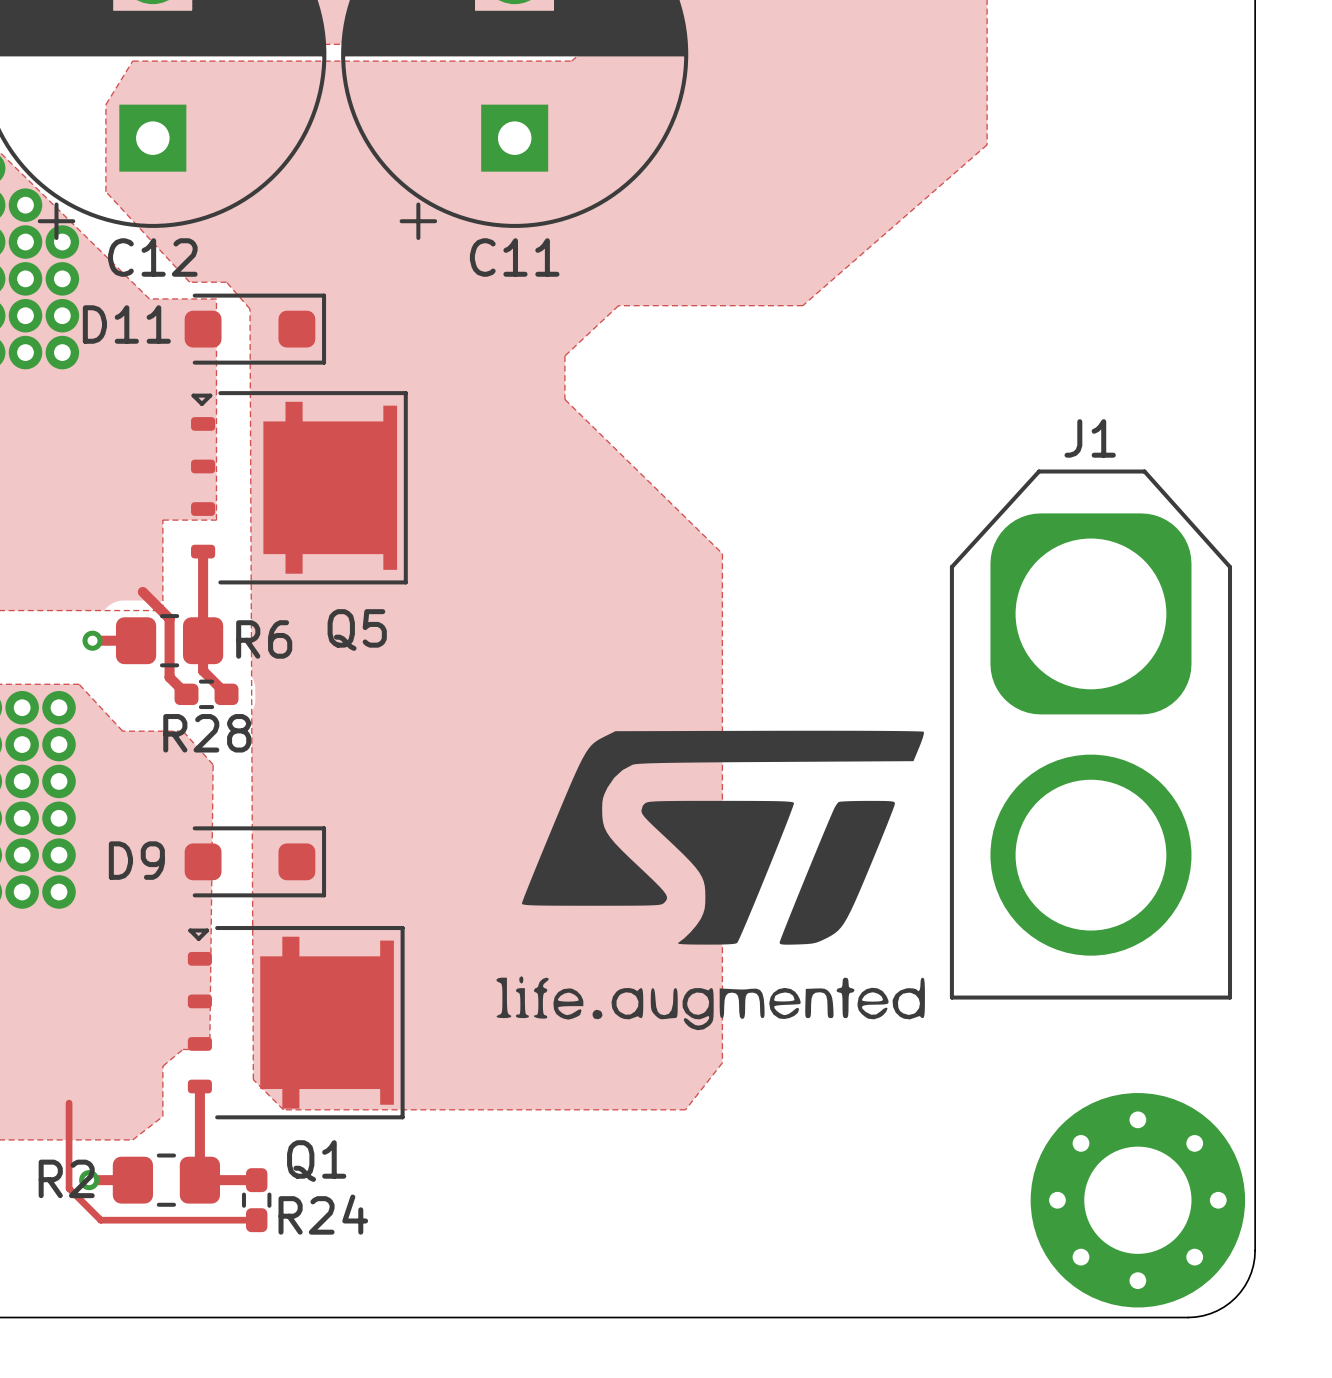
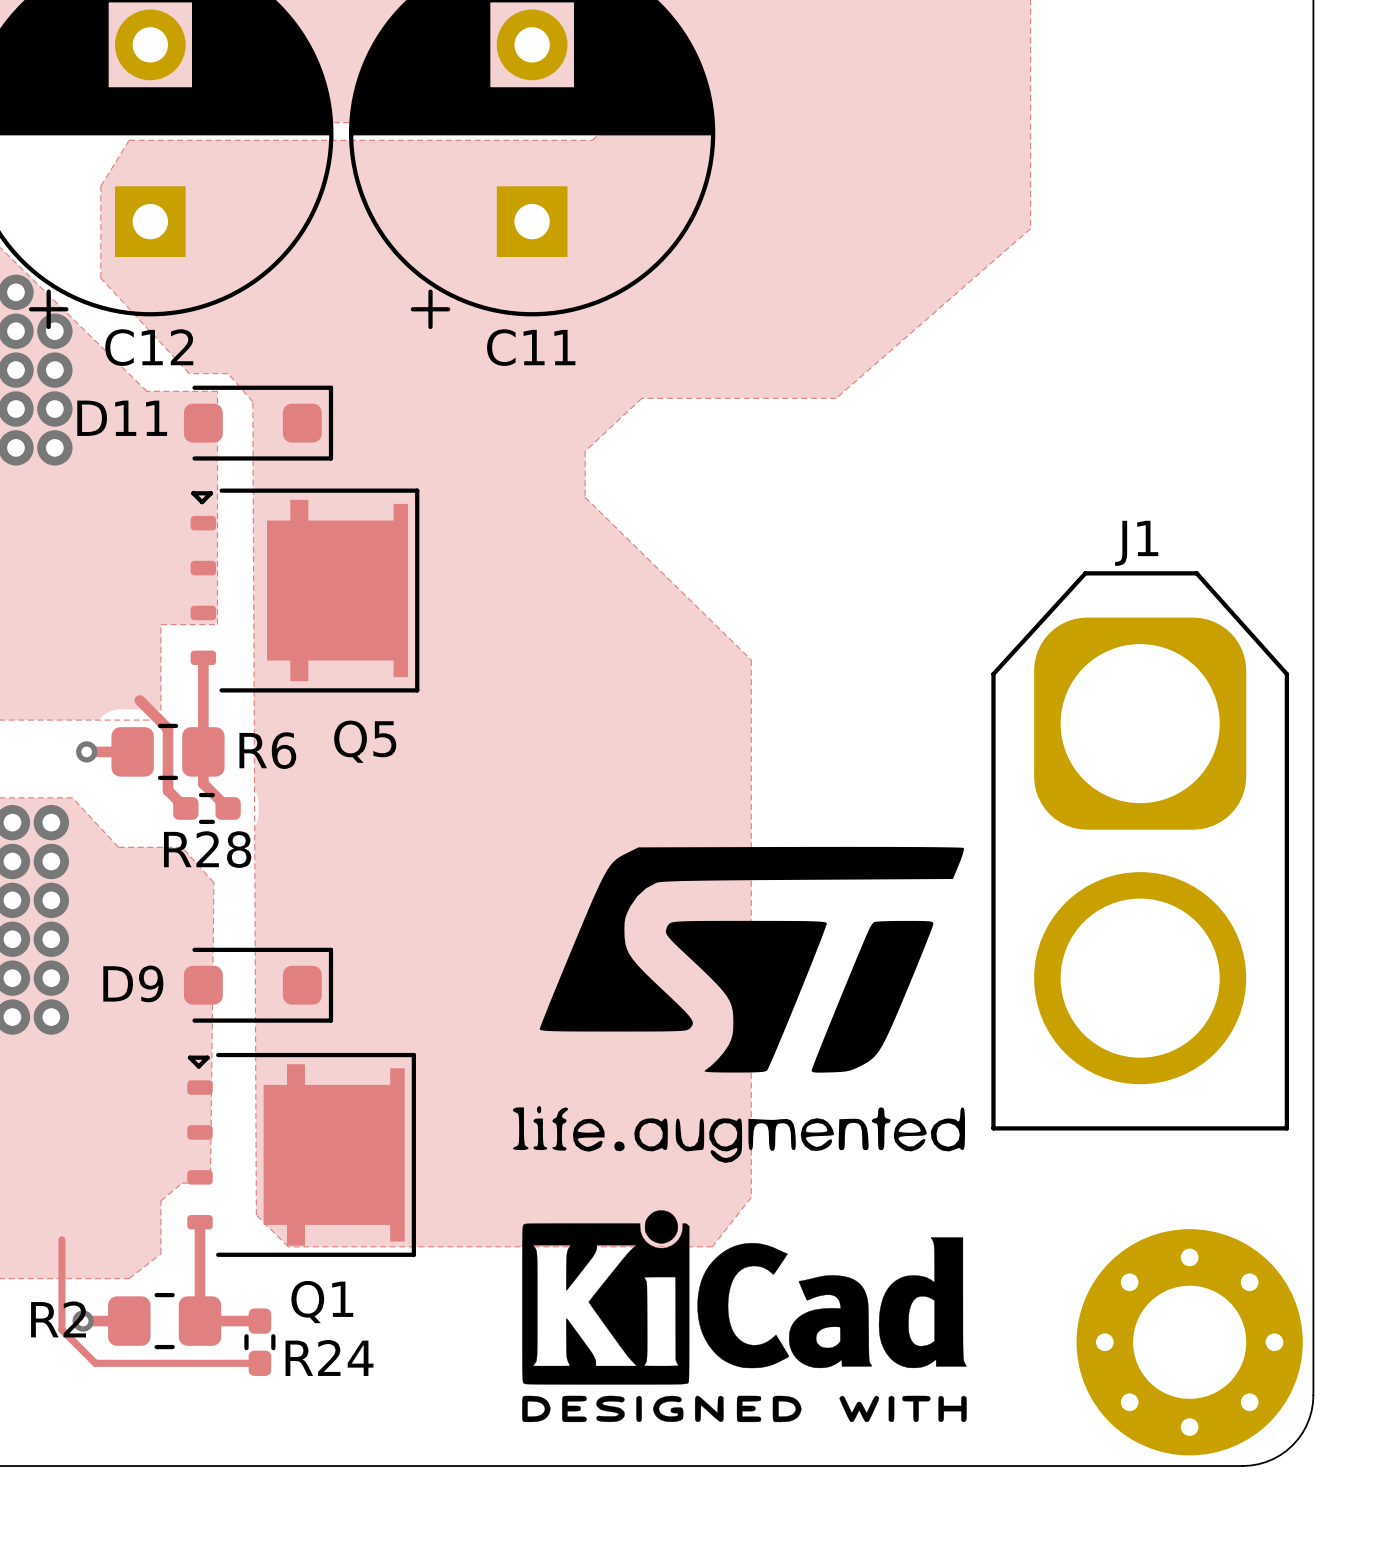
drawing: none -> [522, 1210, 967, 1423]

